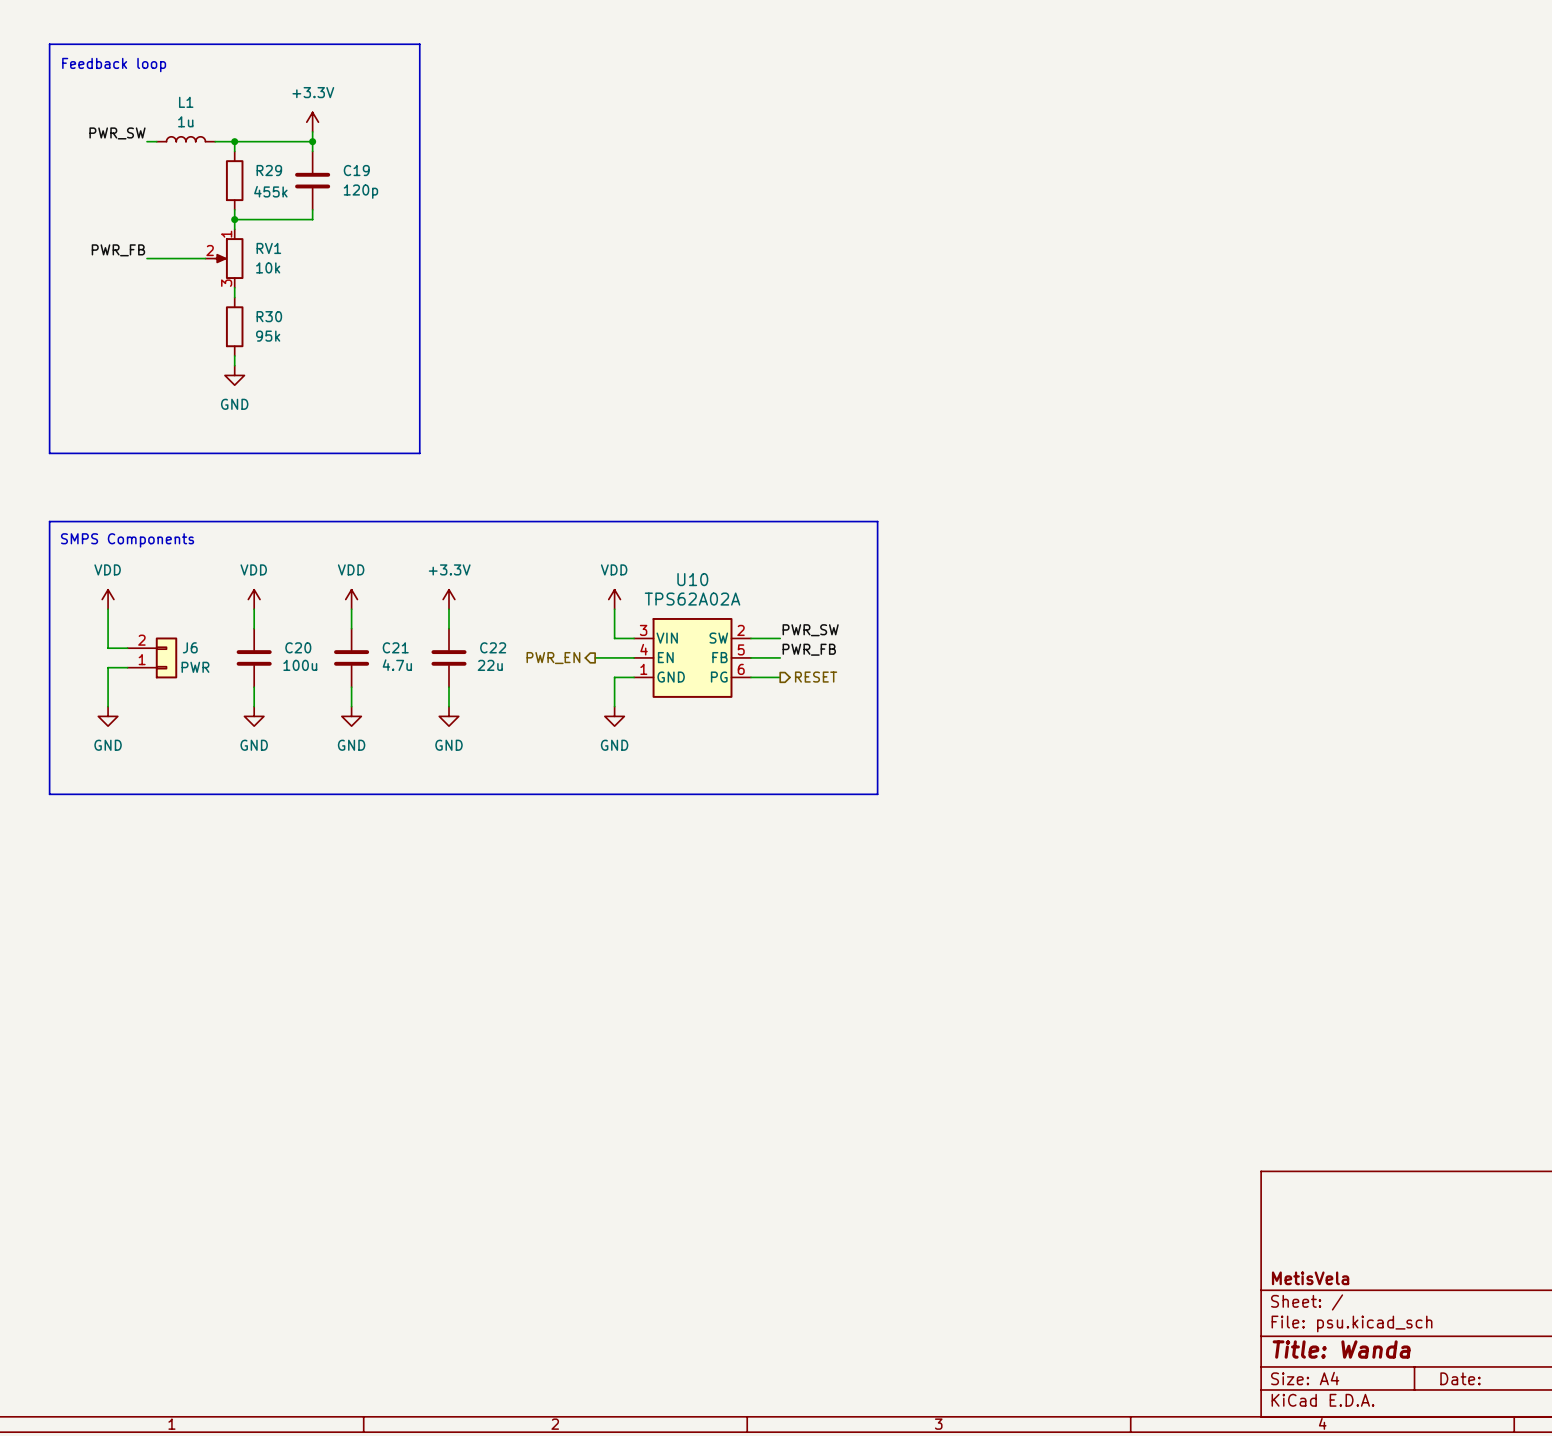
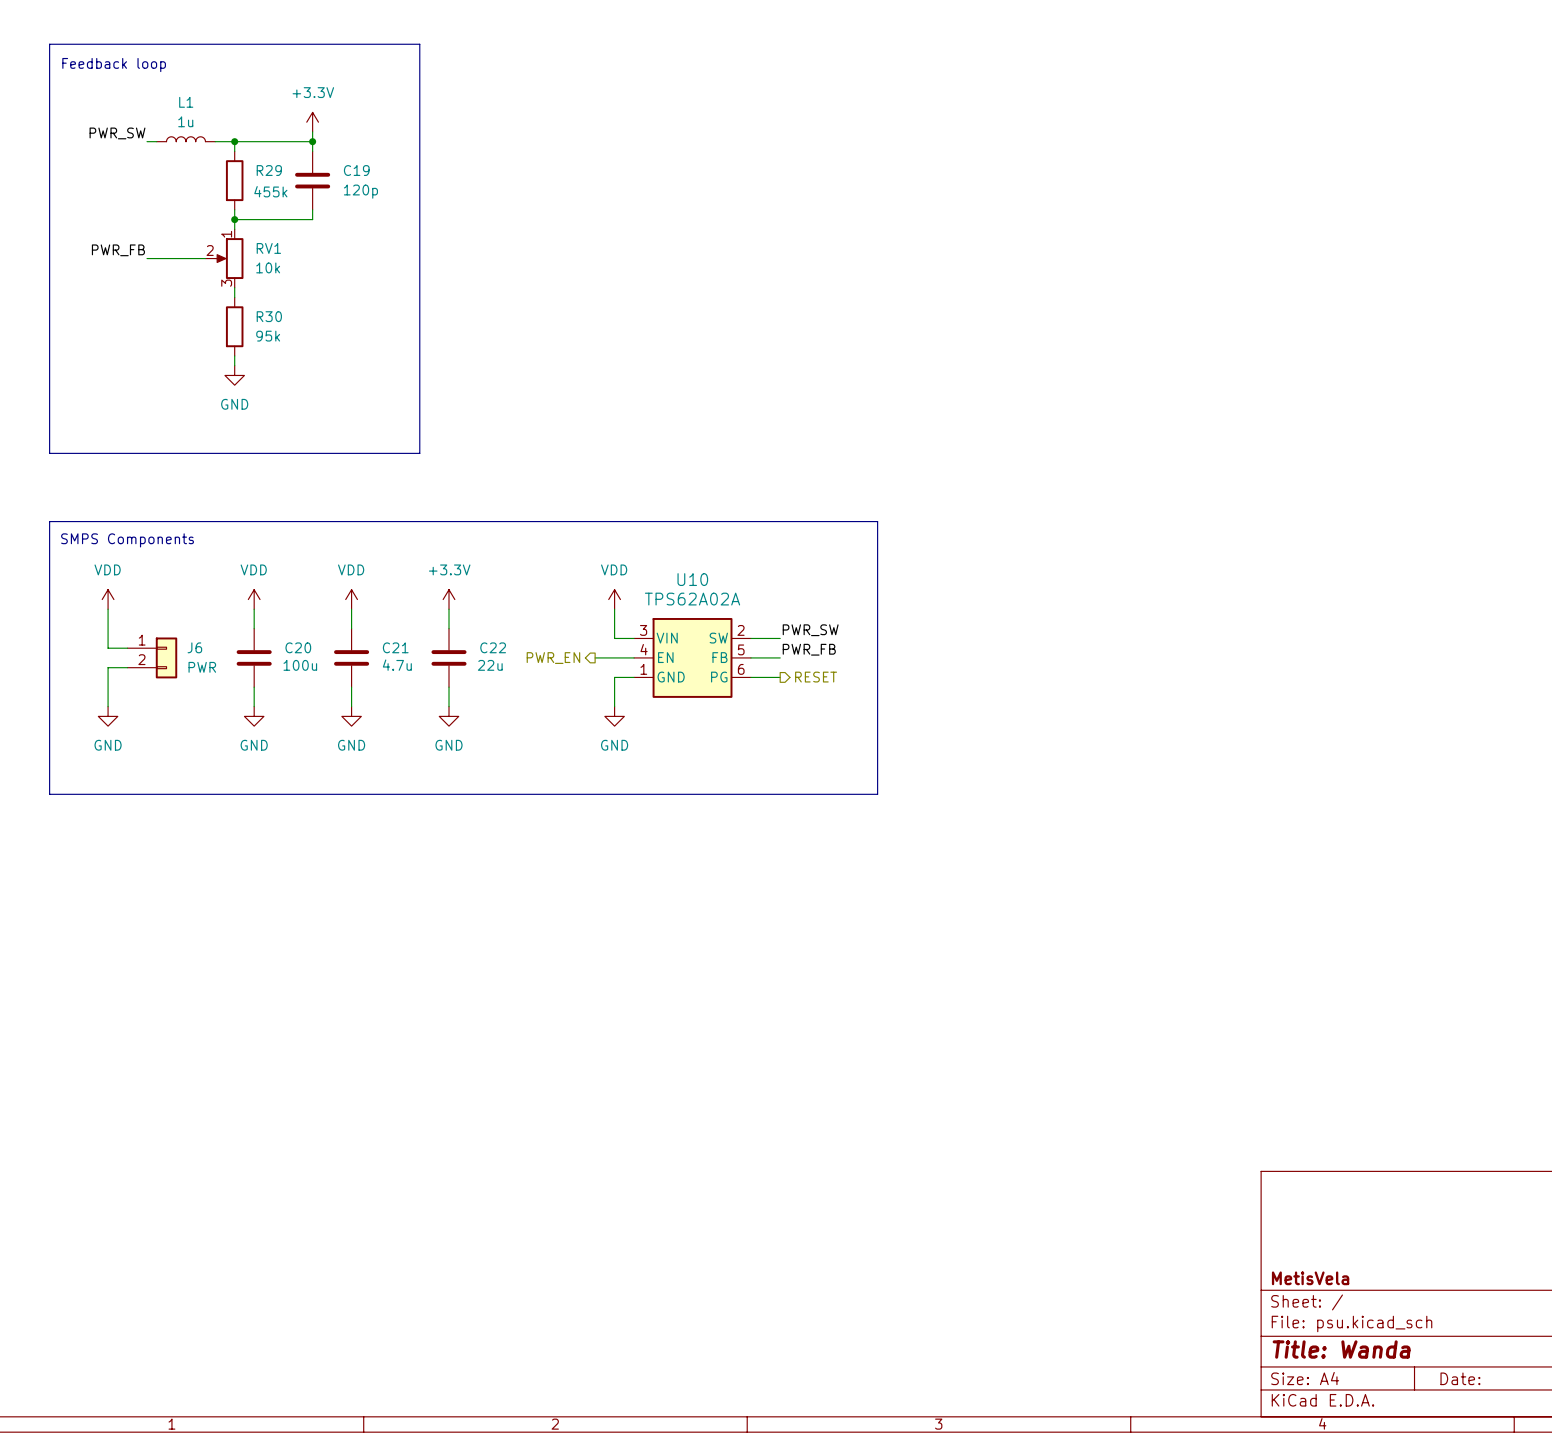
J6 flip: as is (166, 657) -> up-down (166, 657)

